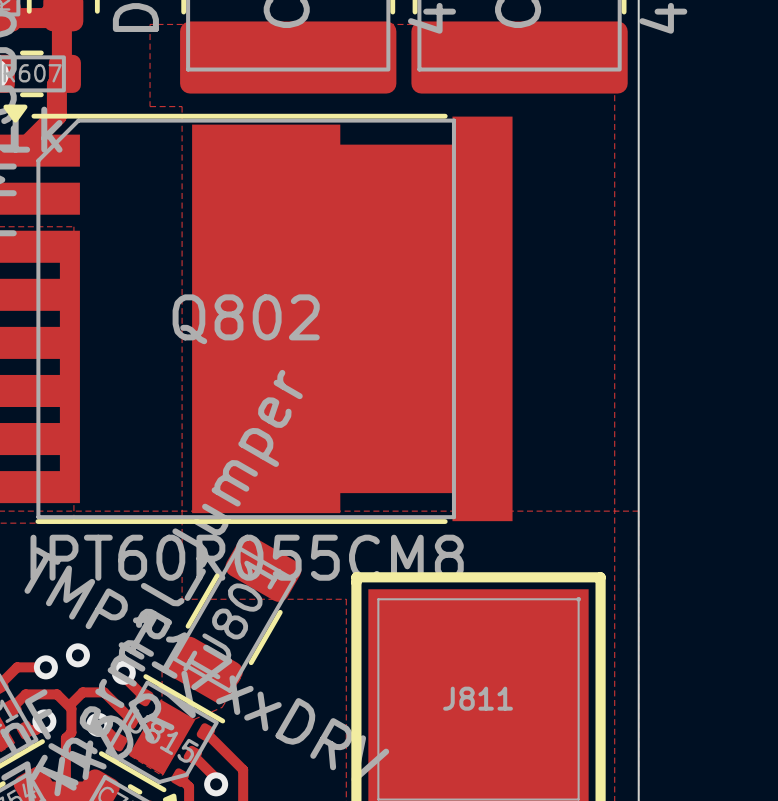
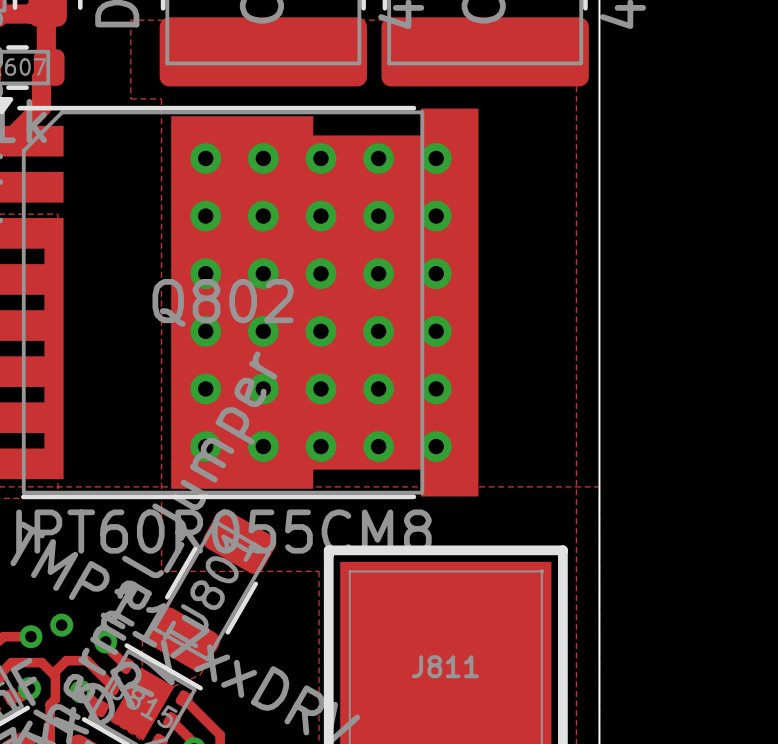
via: none -> (205, 158)
via: none -> (263, 158)
via: none -> (320, 158)
via: none -> (378, 158)
via: none -> (436, 158)
via: none -> (205, 216)
via: none -> (263, 216)
via: none -> (320, 216)
via: none -> (378, 216)
via: none -> (436, 216)
via: none -> (205, 273)
via: none -> (263, 273)
via: none -> (320, 273)
via: none -> (378, 273)
via: none -> (436, 273)
via: none -> (205, 331)
via: none -> (263, 331)
via: none -> (320, 331)
via: none -> (378, 331)
via: none -> (436, 331)
via: none -> (205, 388)
via: none -> (263, 388)
via: none -> (320, 388)
via: none -> (378, 388)
via: none -> (436, 388)
via: none -> (205, 446)
via: none -> (263, 446)
via: none -> (320, 446)
via: none -> (378, 446)
via: none -> (436, 446)

